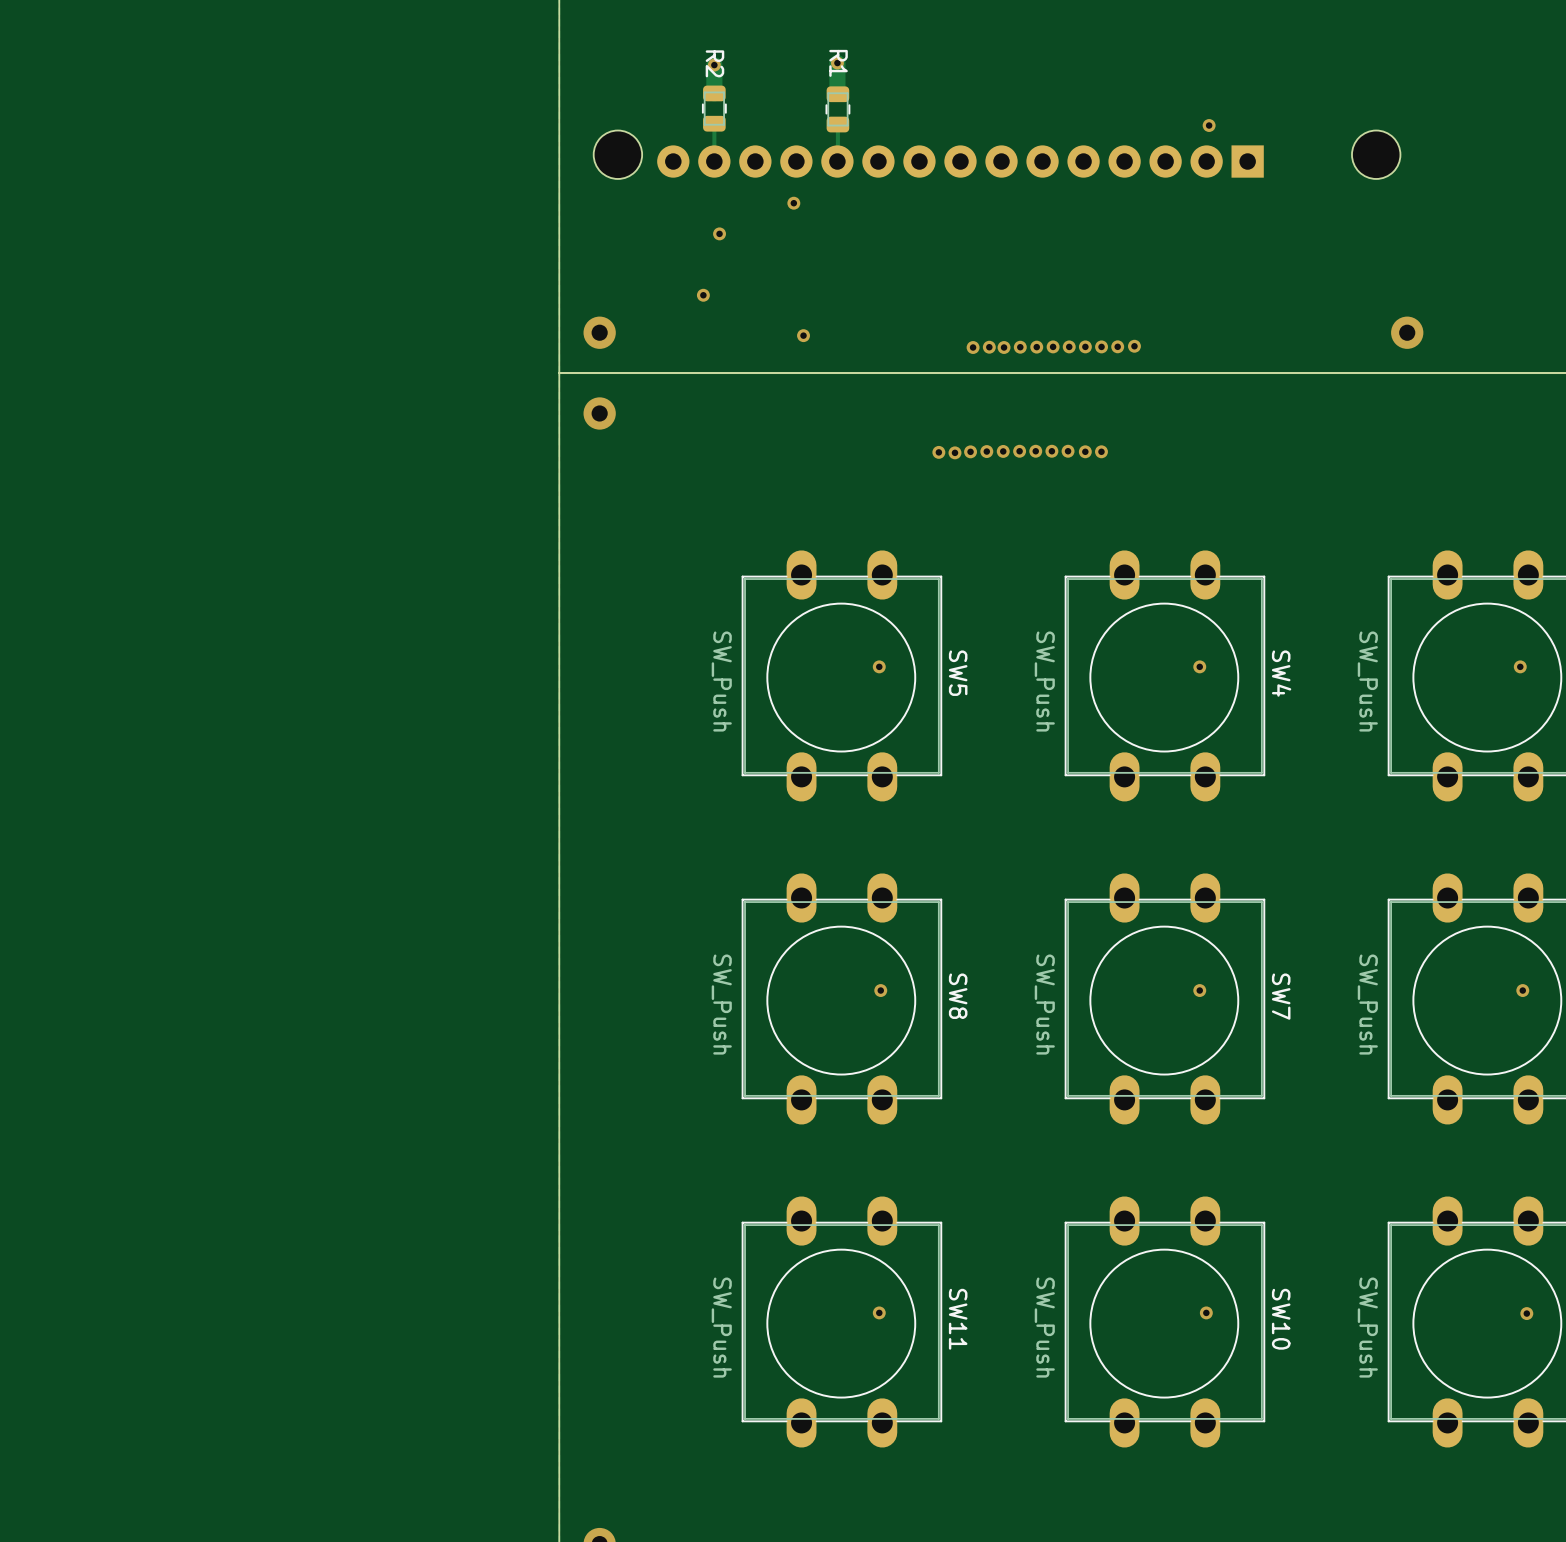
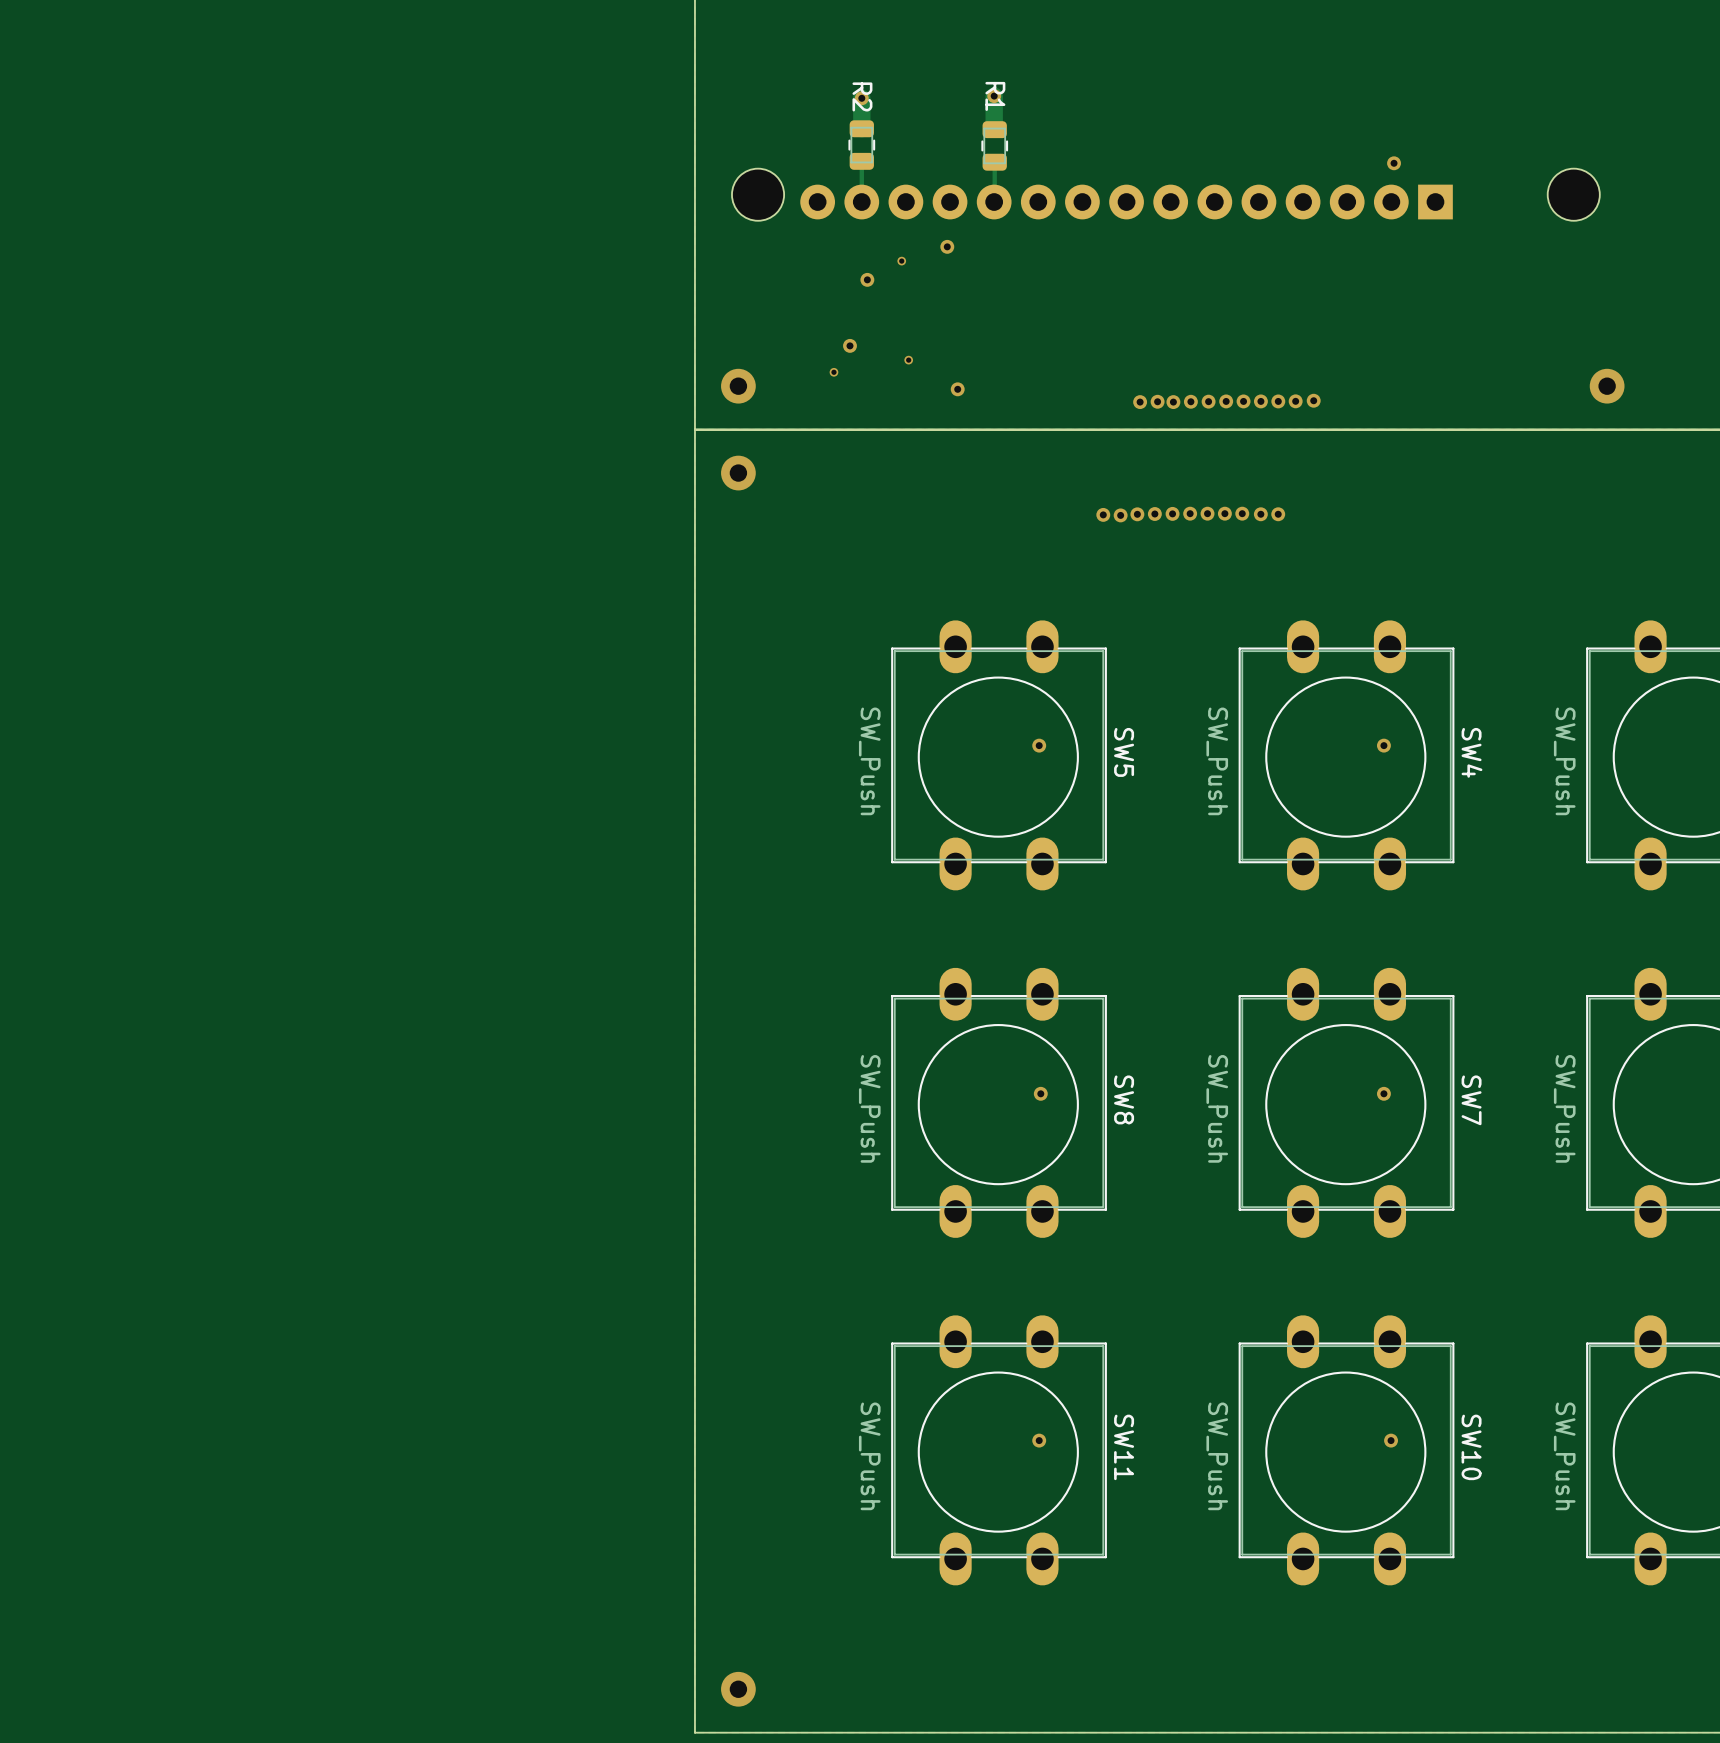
via: none -> (901, 261)
via: none -> (908, 360)
via: none -> (833, 372)

